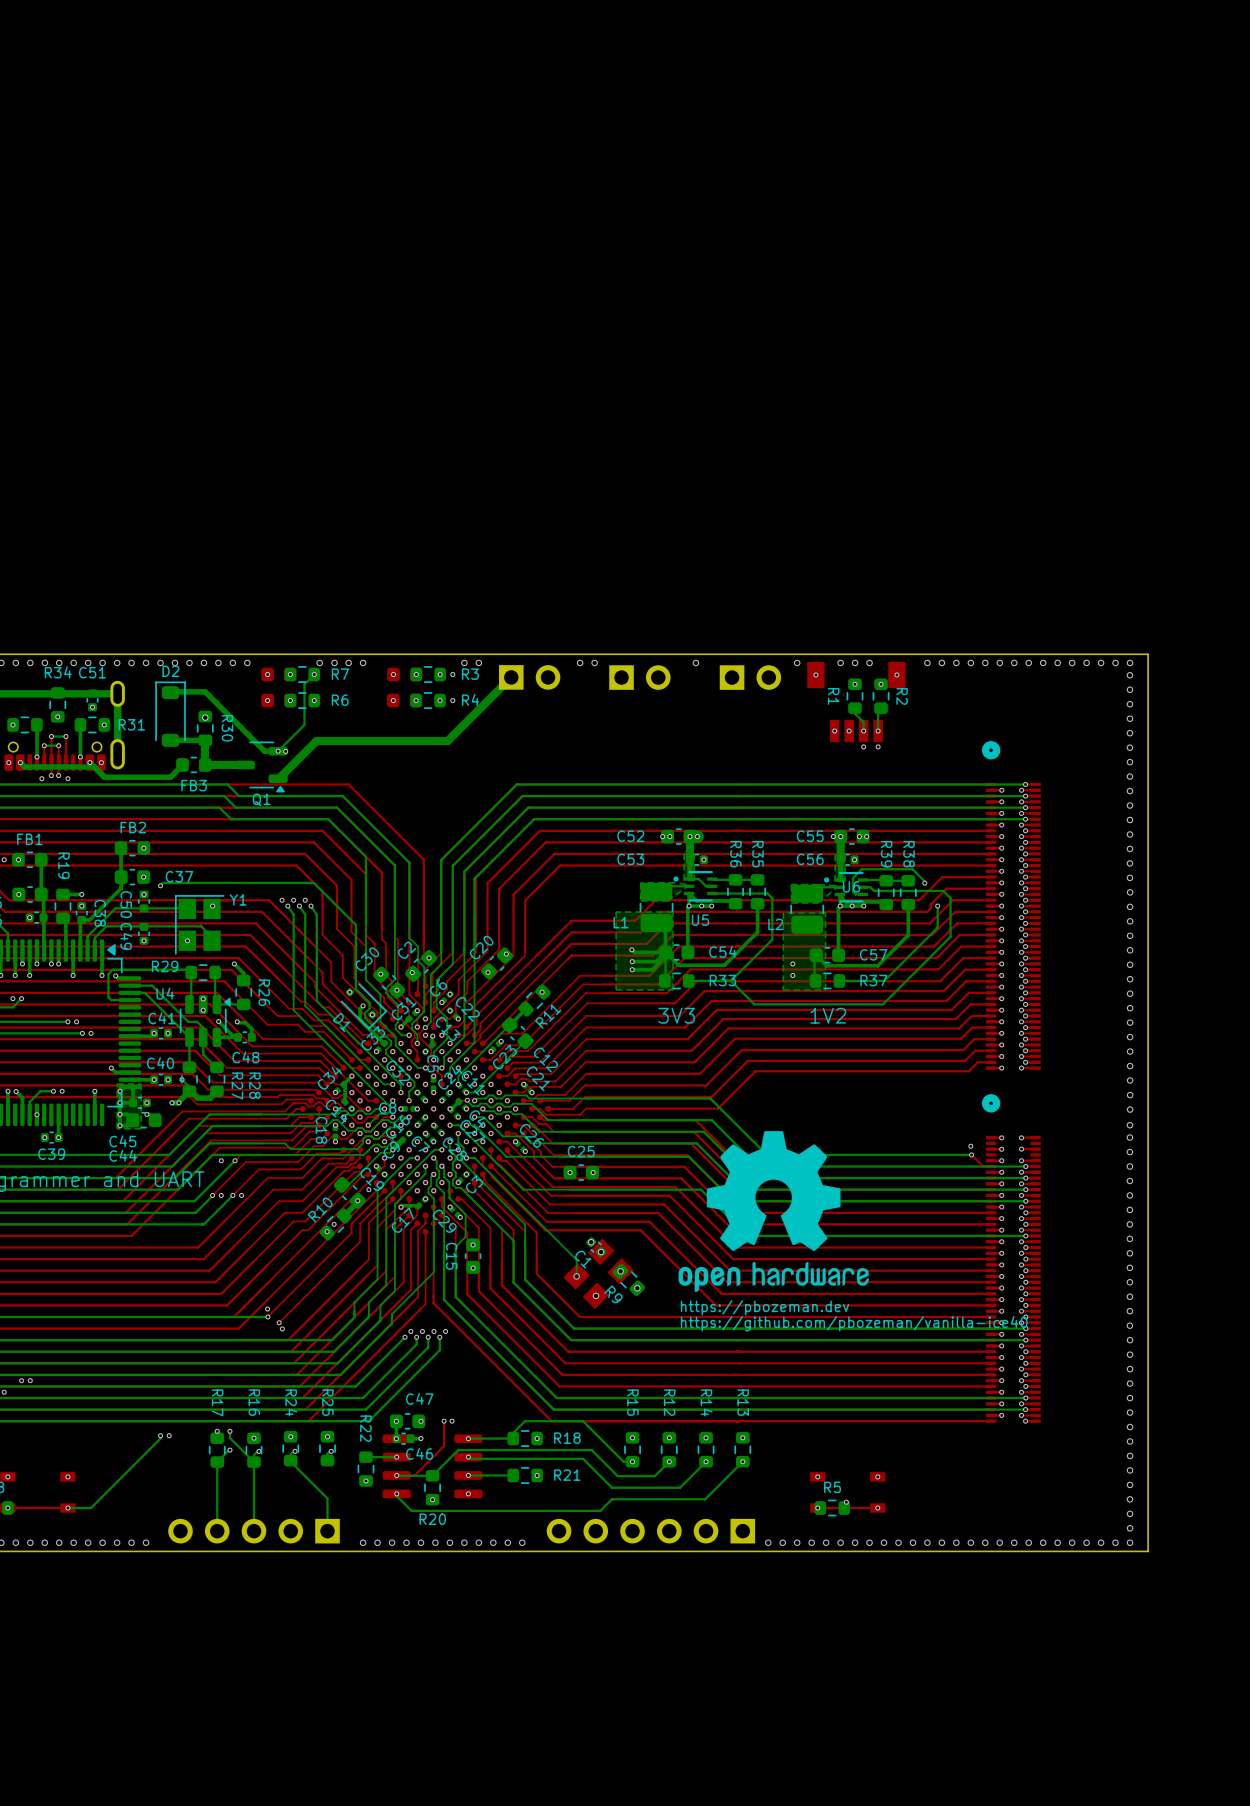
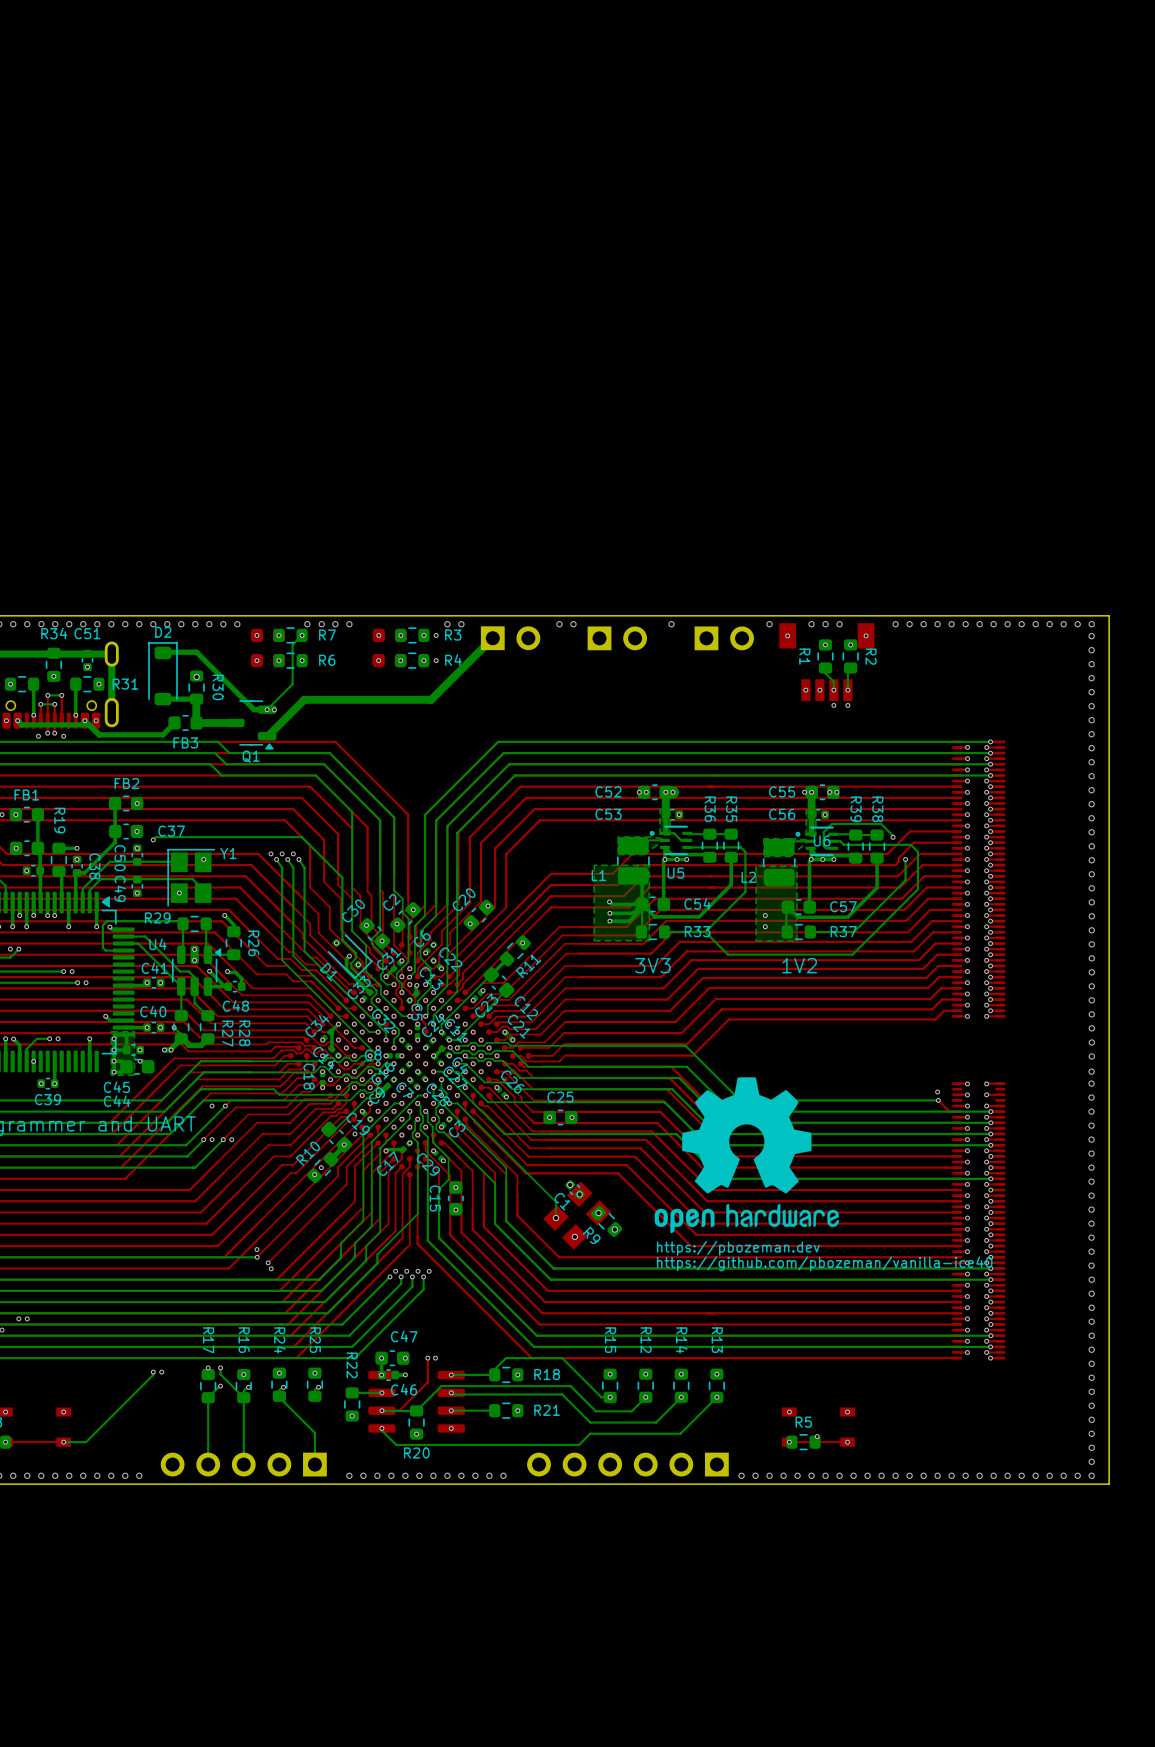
part: (1011, 905) -> none
part: (1011, 1258) -> none

